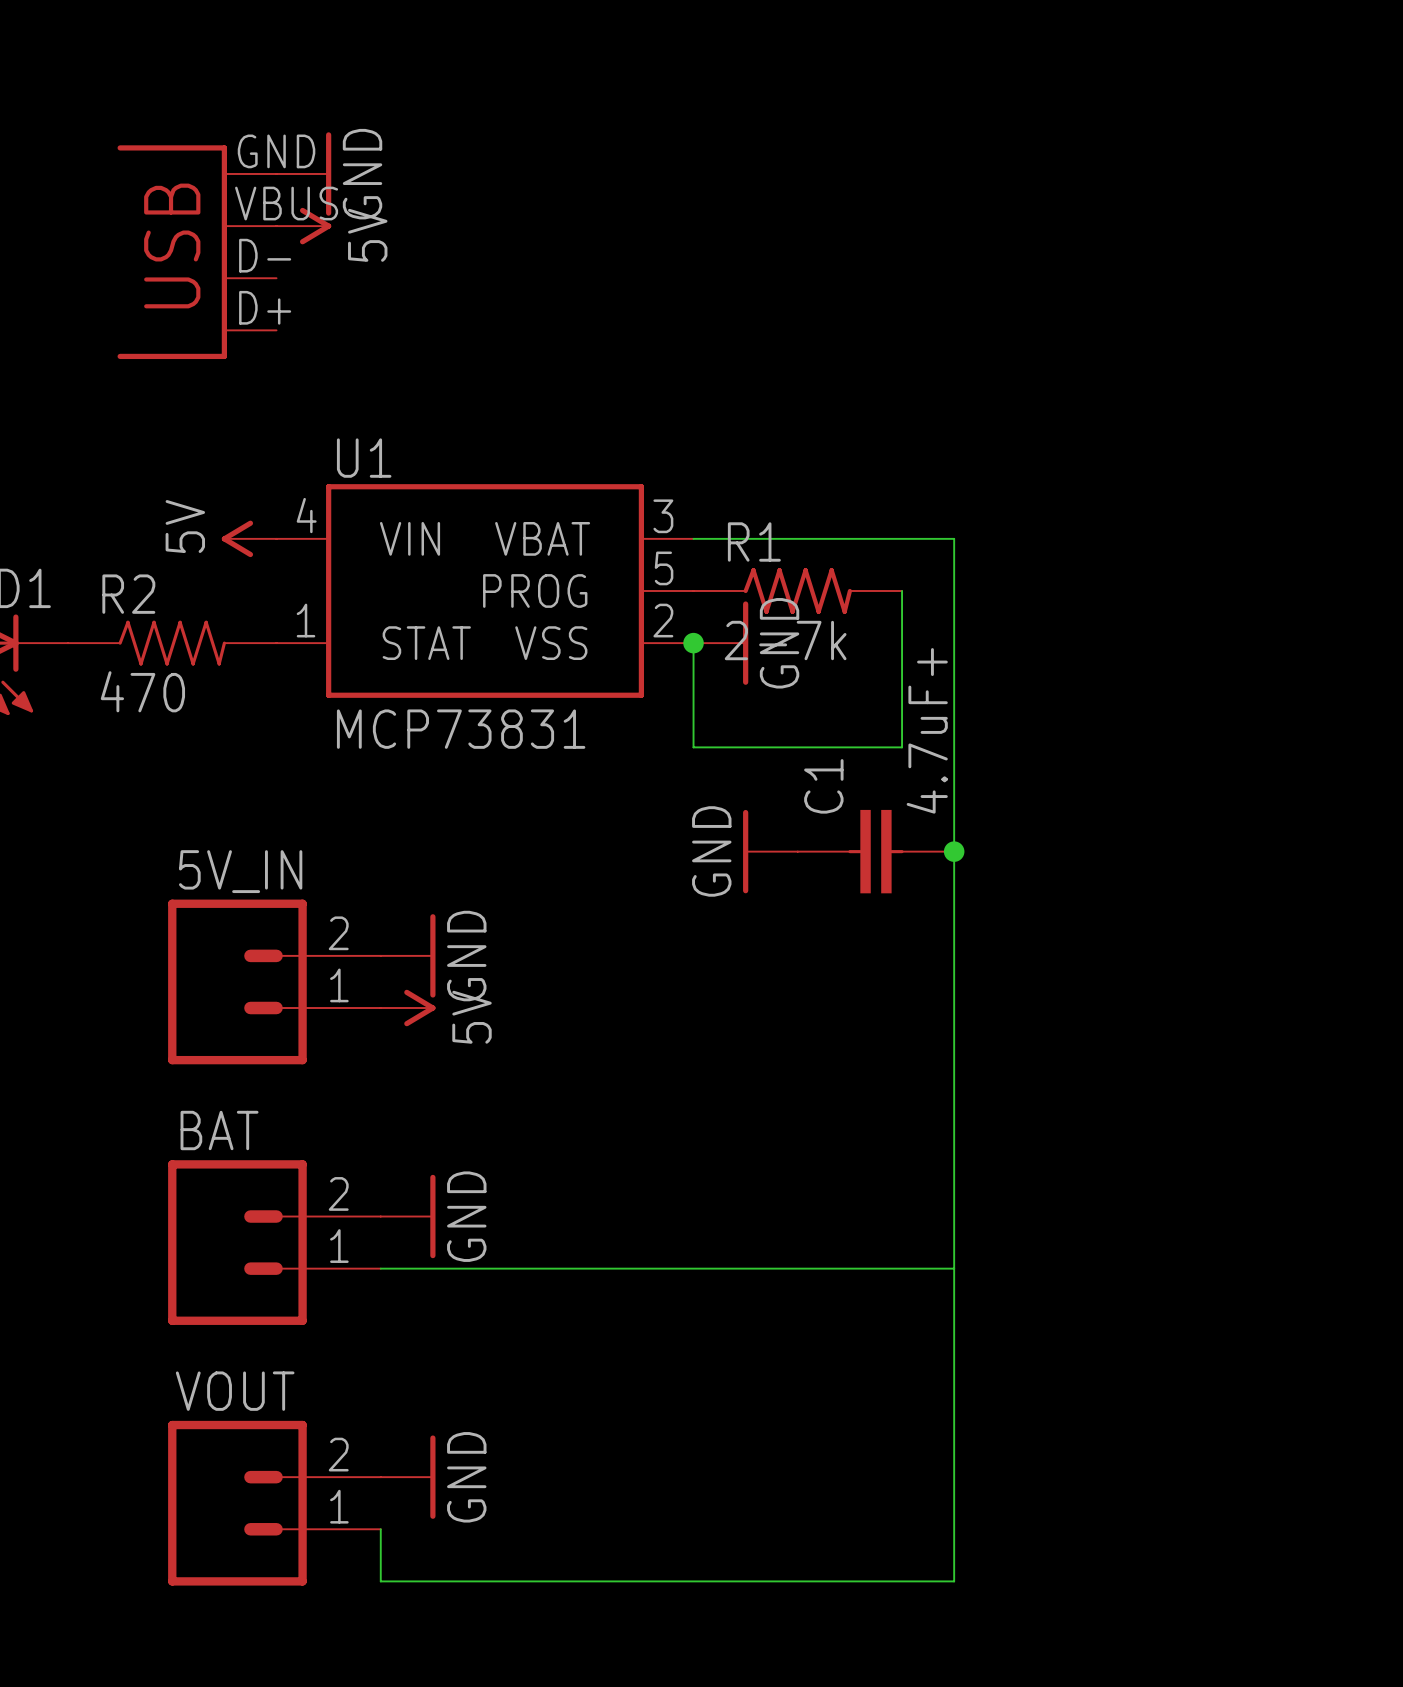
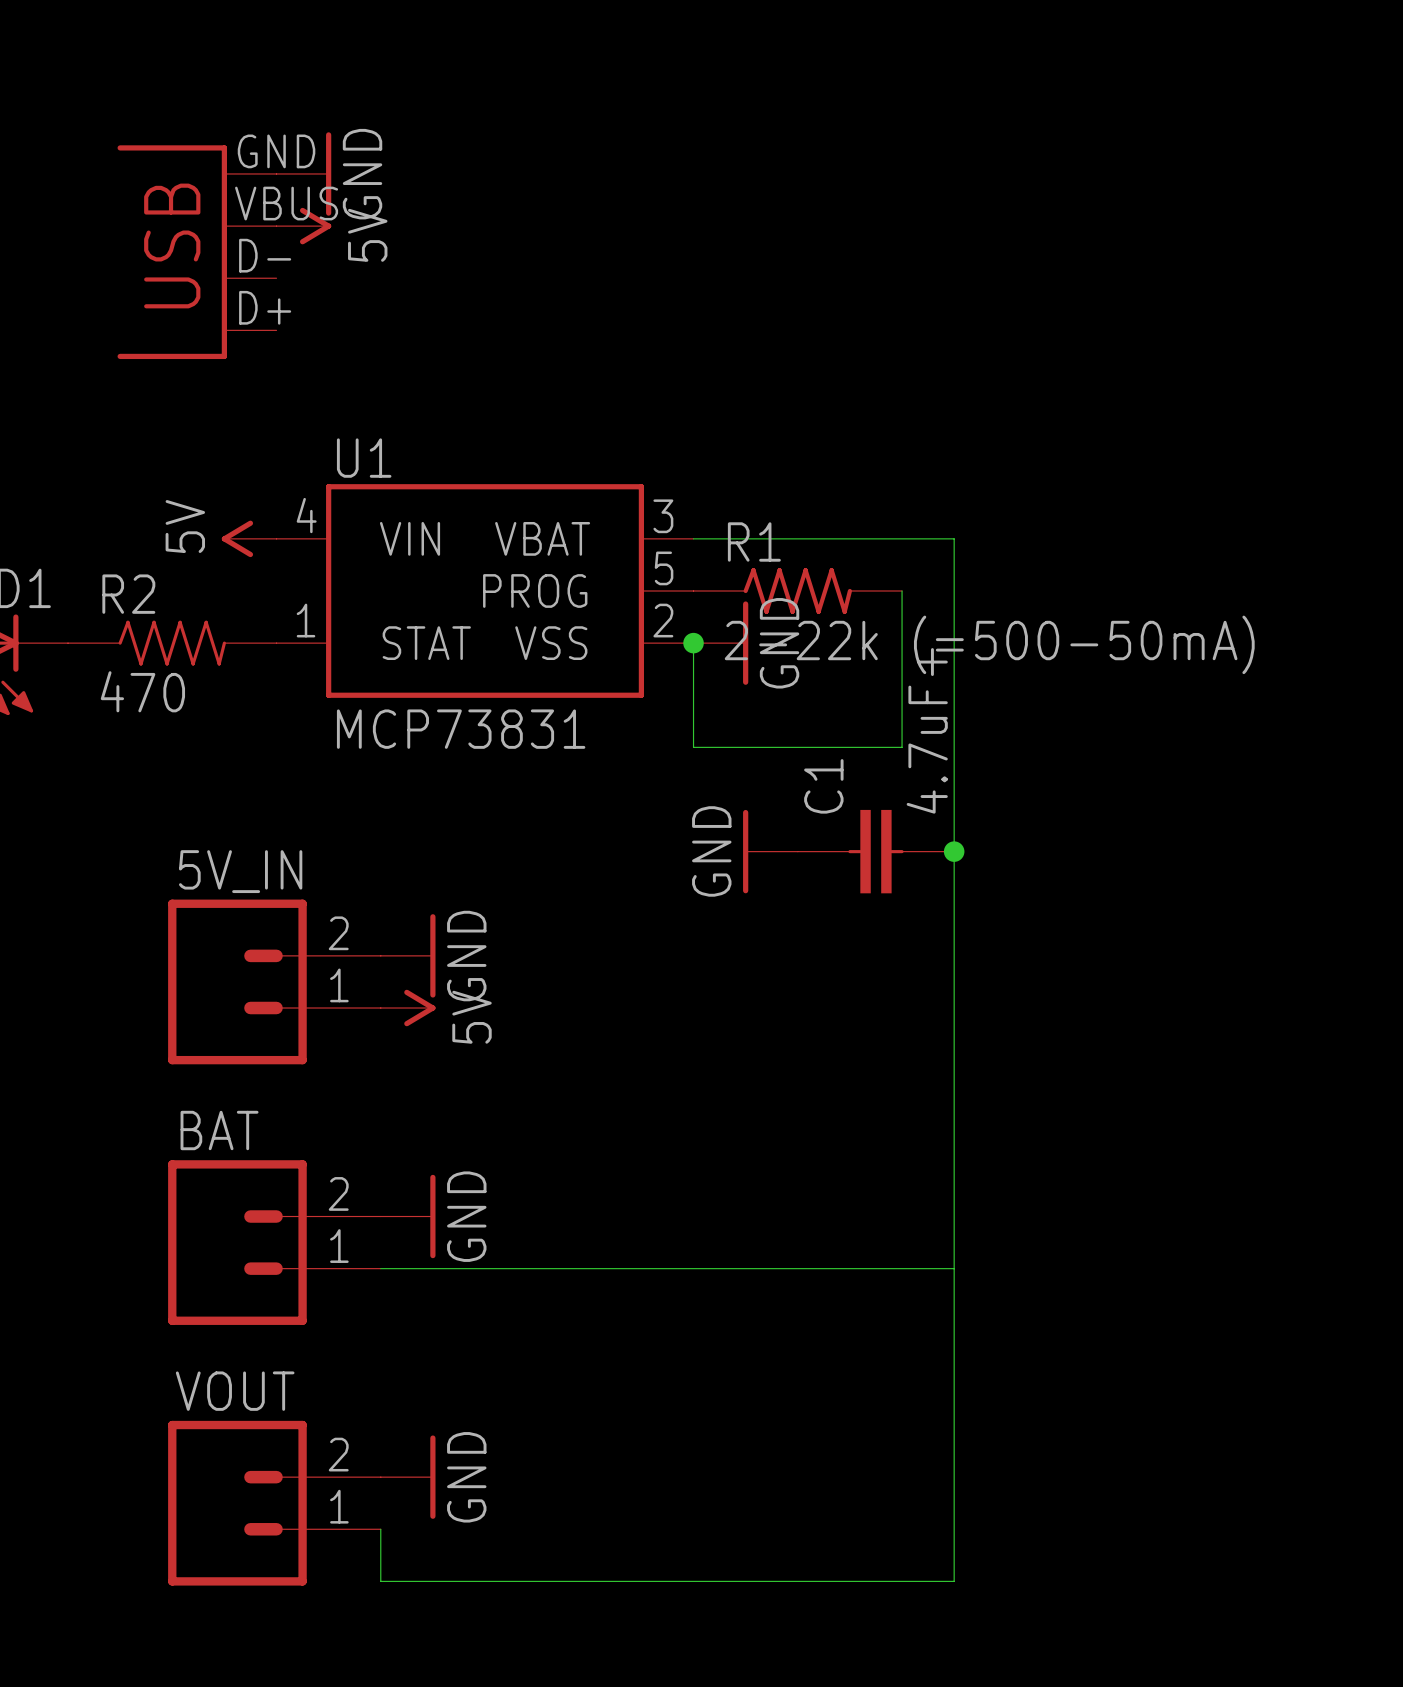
R1 value: 2-7k (785, 640) -> 2-22k (=500-50mA) (989, 644)

